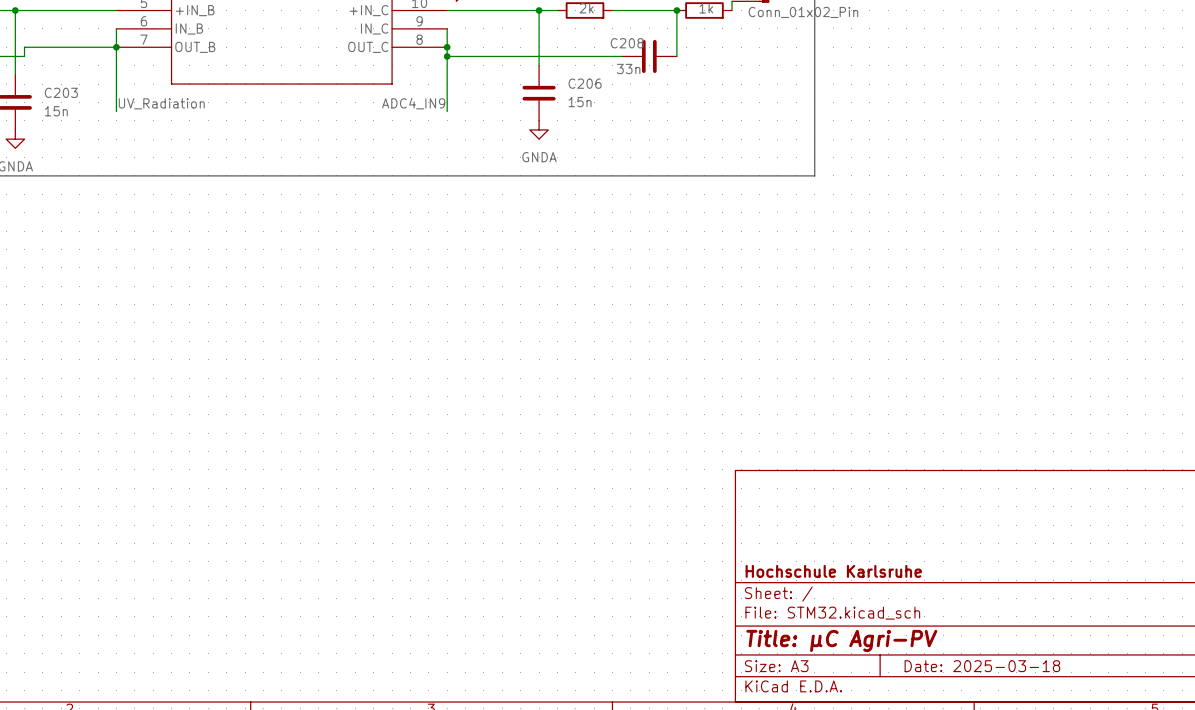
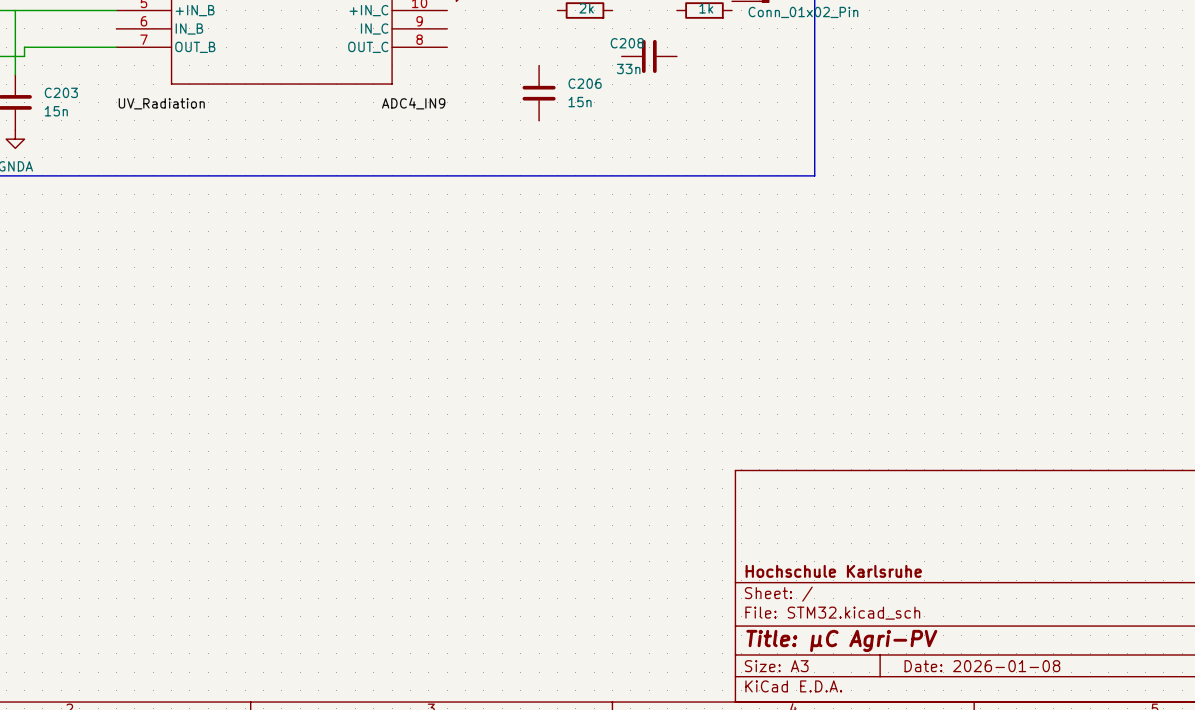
wire: (732, 1) (732, 10) -> none
junction: (15, 10) -> none
wire: (447, 10) (557, 10) -> none
wire: (539, 10) (539, 65) -> none
junction: (539, 10) -> none
wire: (612, 10) (676, 10) (676, 56) -> none
junction: (676, 10) -> none
wire: (116, 28) (116, 111) -> none
wire: (447, 28) (447, 111) -> none
junction: (116, 47) -> none
junction: (447, 47) -> none
wire: (447, 56) (621, 56) -> none
junction: (447, 56) -> none
power symbol: GNDA (539, 129) -> none
title block: Date: 2025-03-18 (982, 666) -> Date: 2026-01-08 (982, 666)

